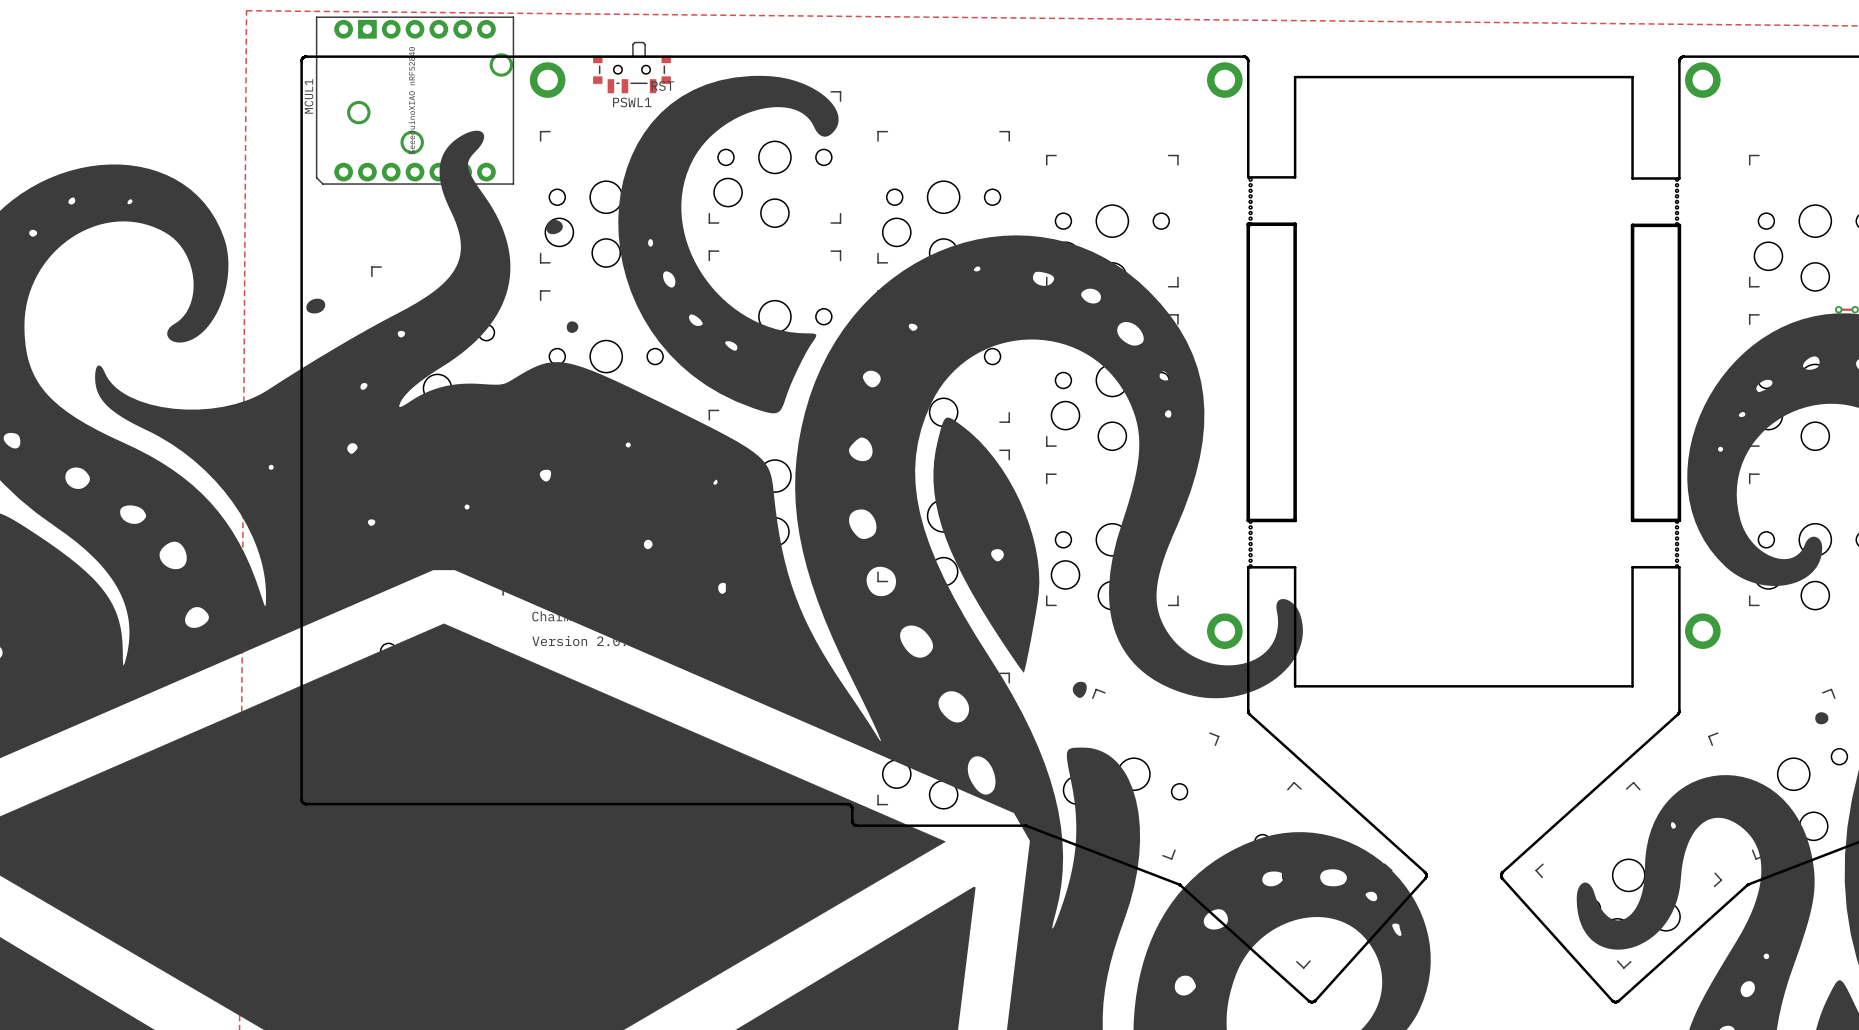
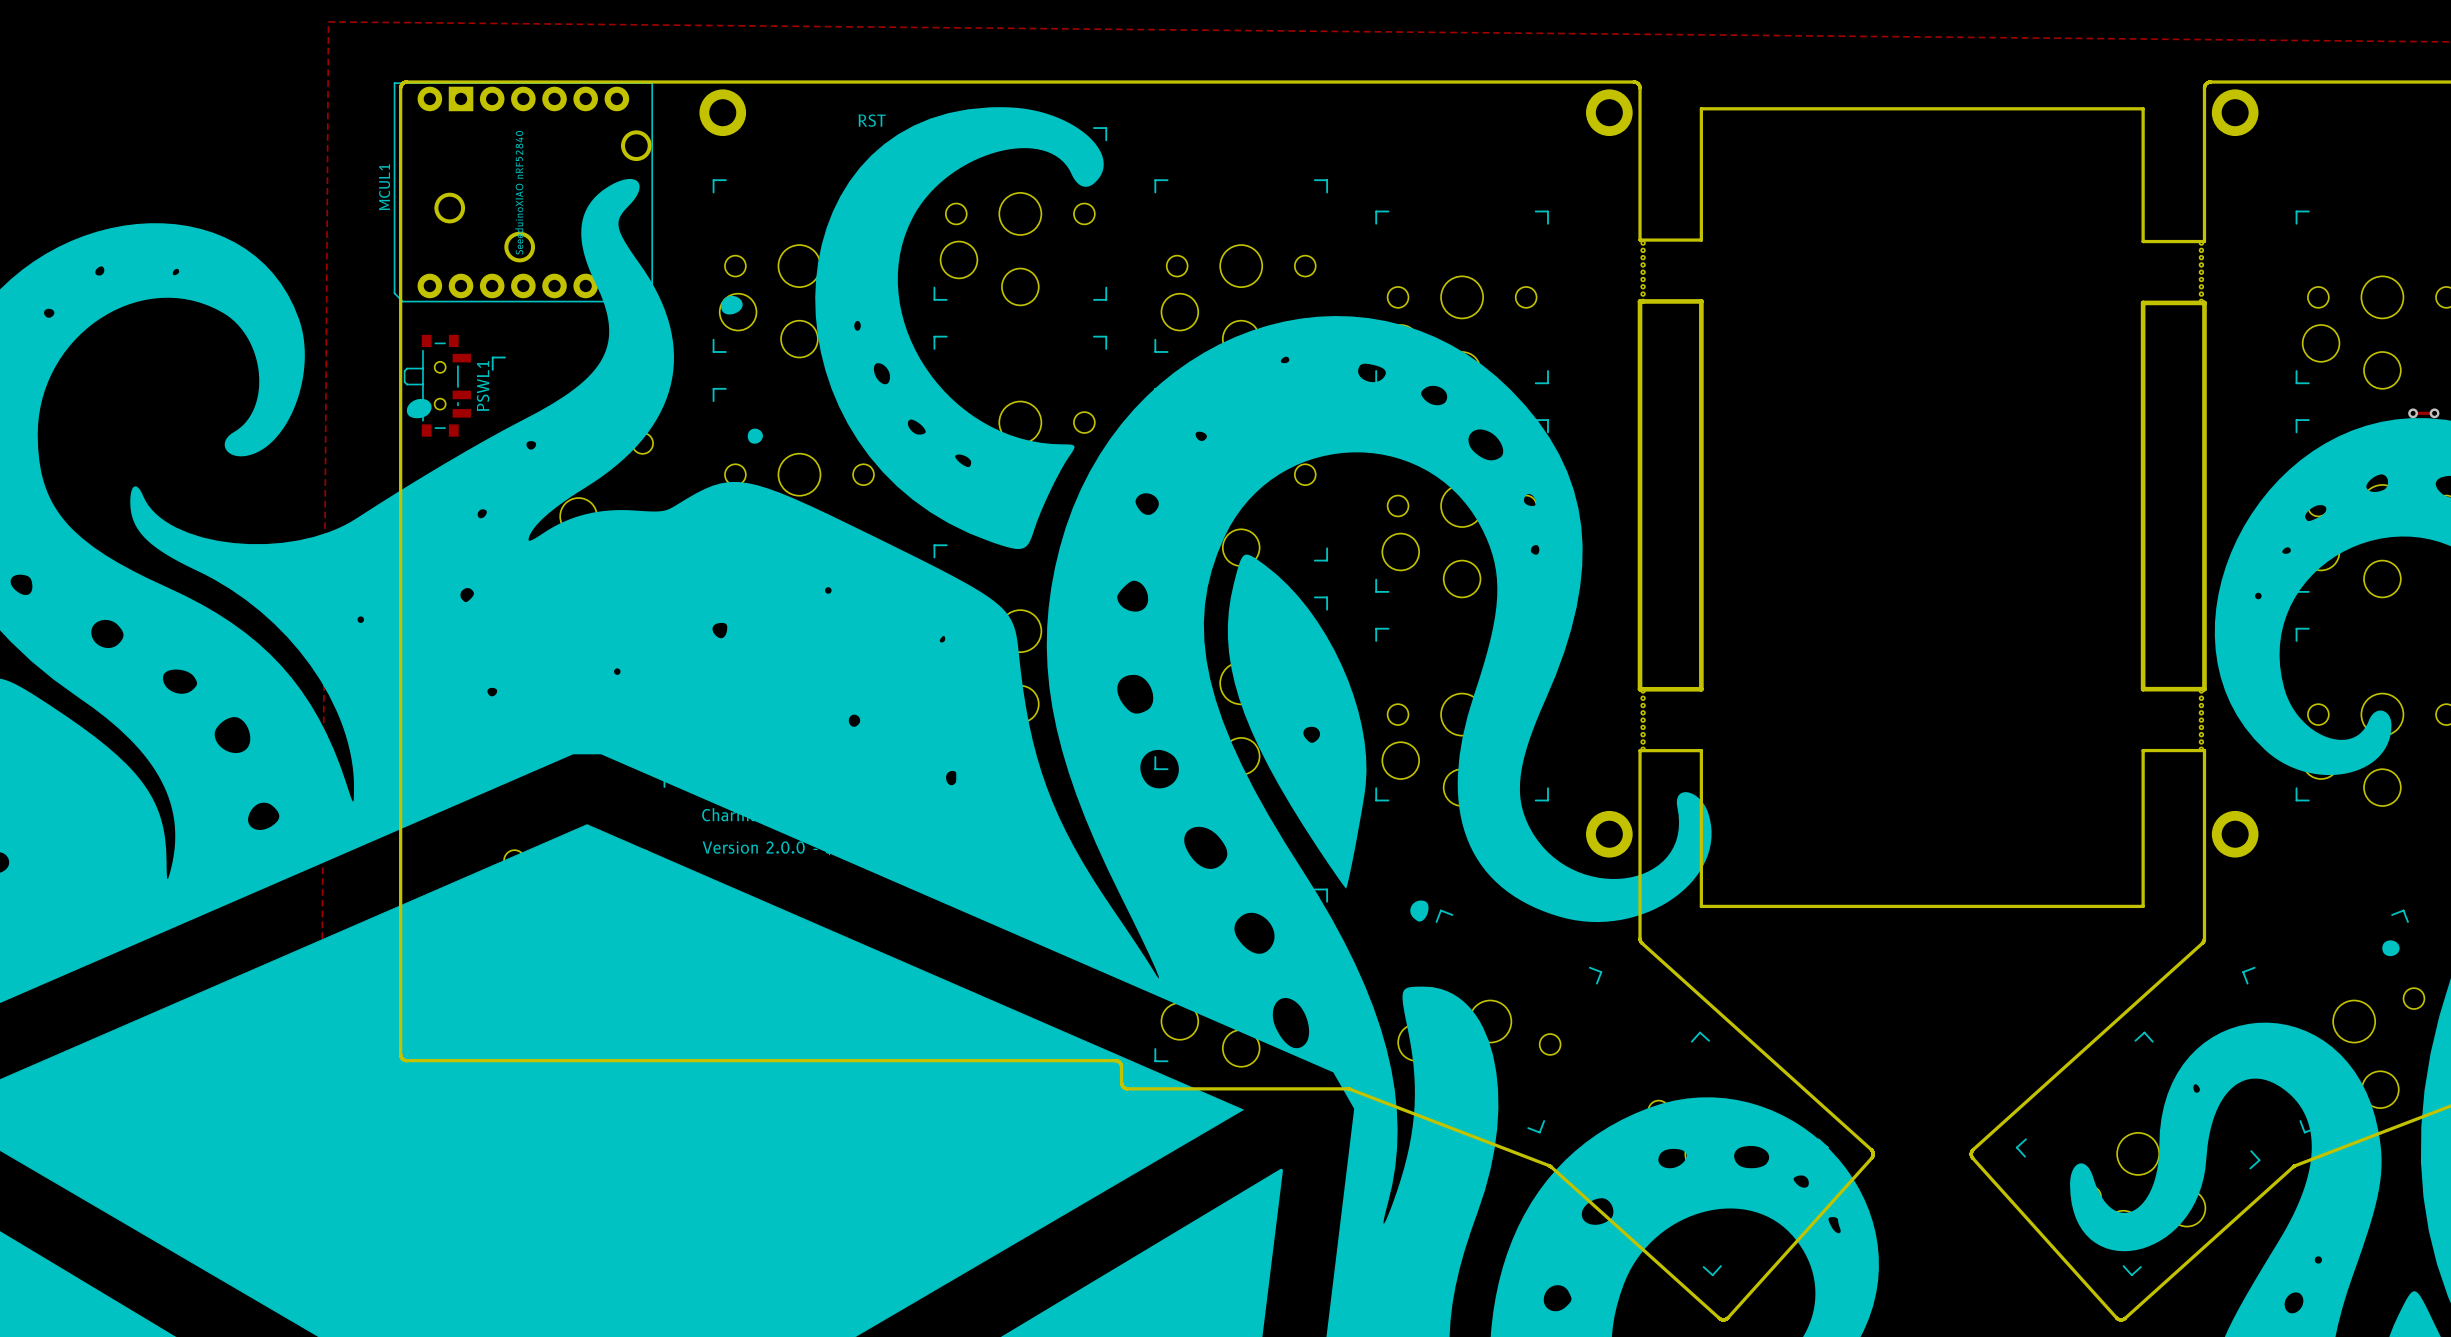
PSWL1 rotation: 0° (632, 67) -> 90° counterclockwise (437, 385)
PSWL1 position: (632, 67) -> (437, 385)
MCUL1 position: (415, 100) -> (523, 192)

